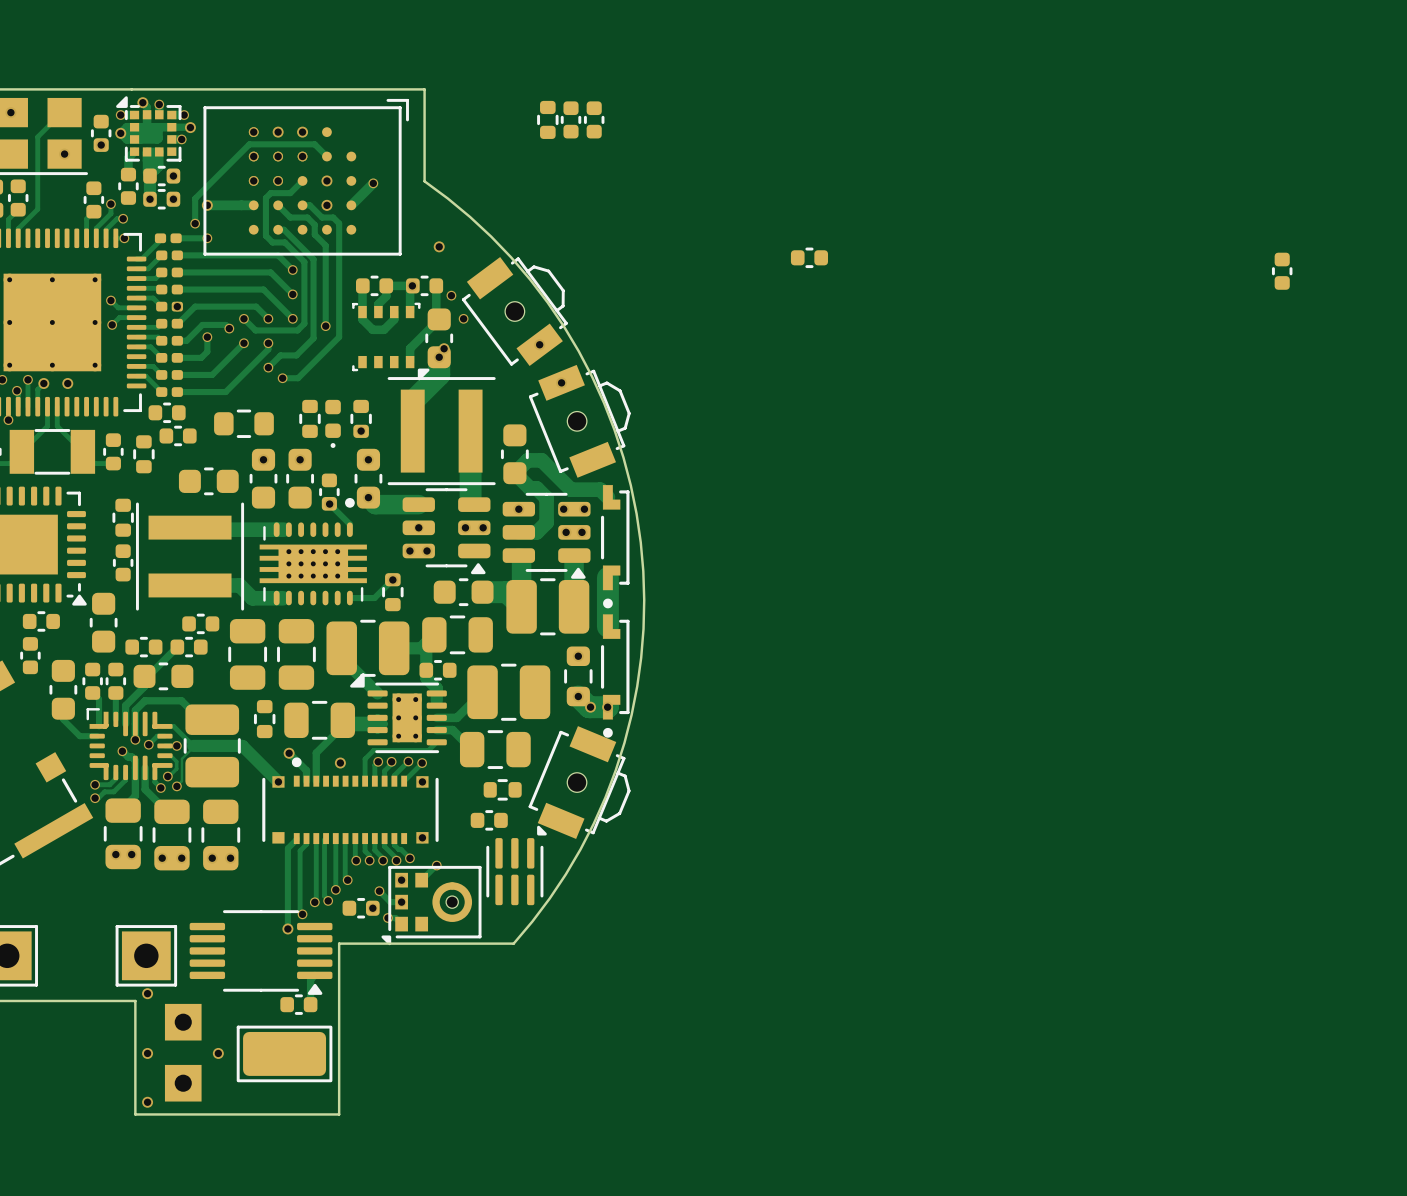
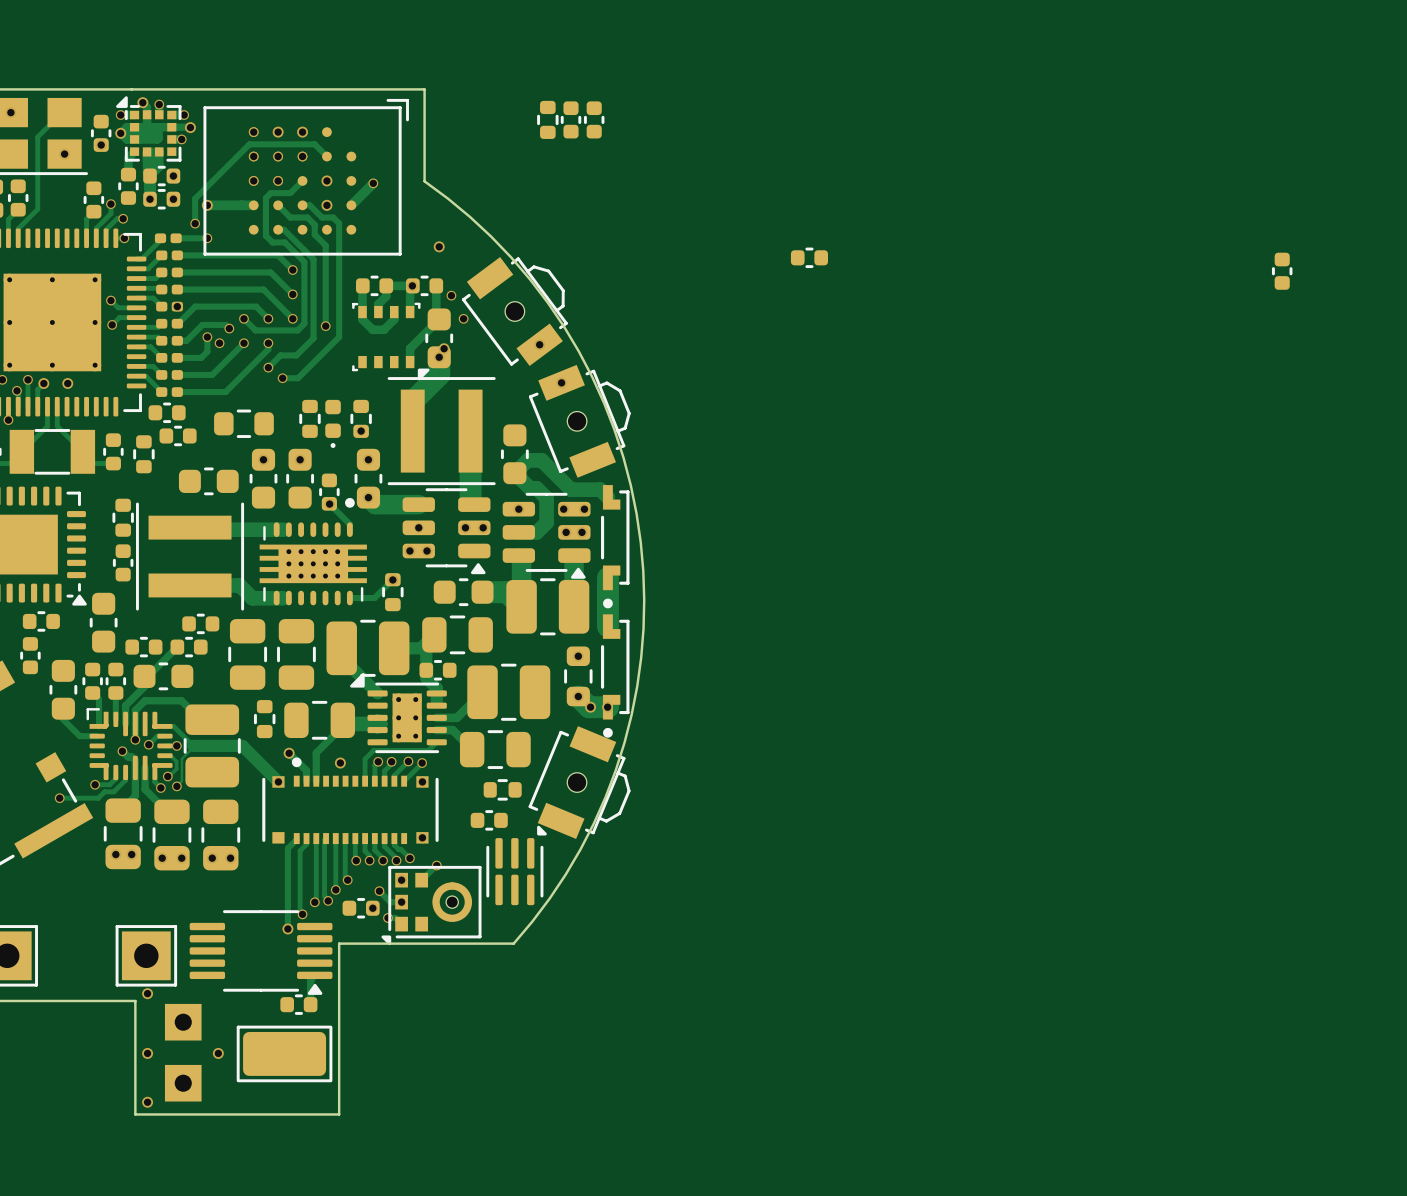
via: none -> (219, 343)
track: none -> (59, 798) (95, 798)
via position: (95, 798) -> (59, 798)

